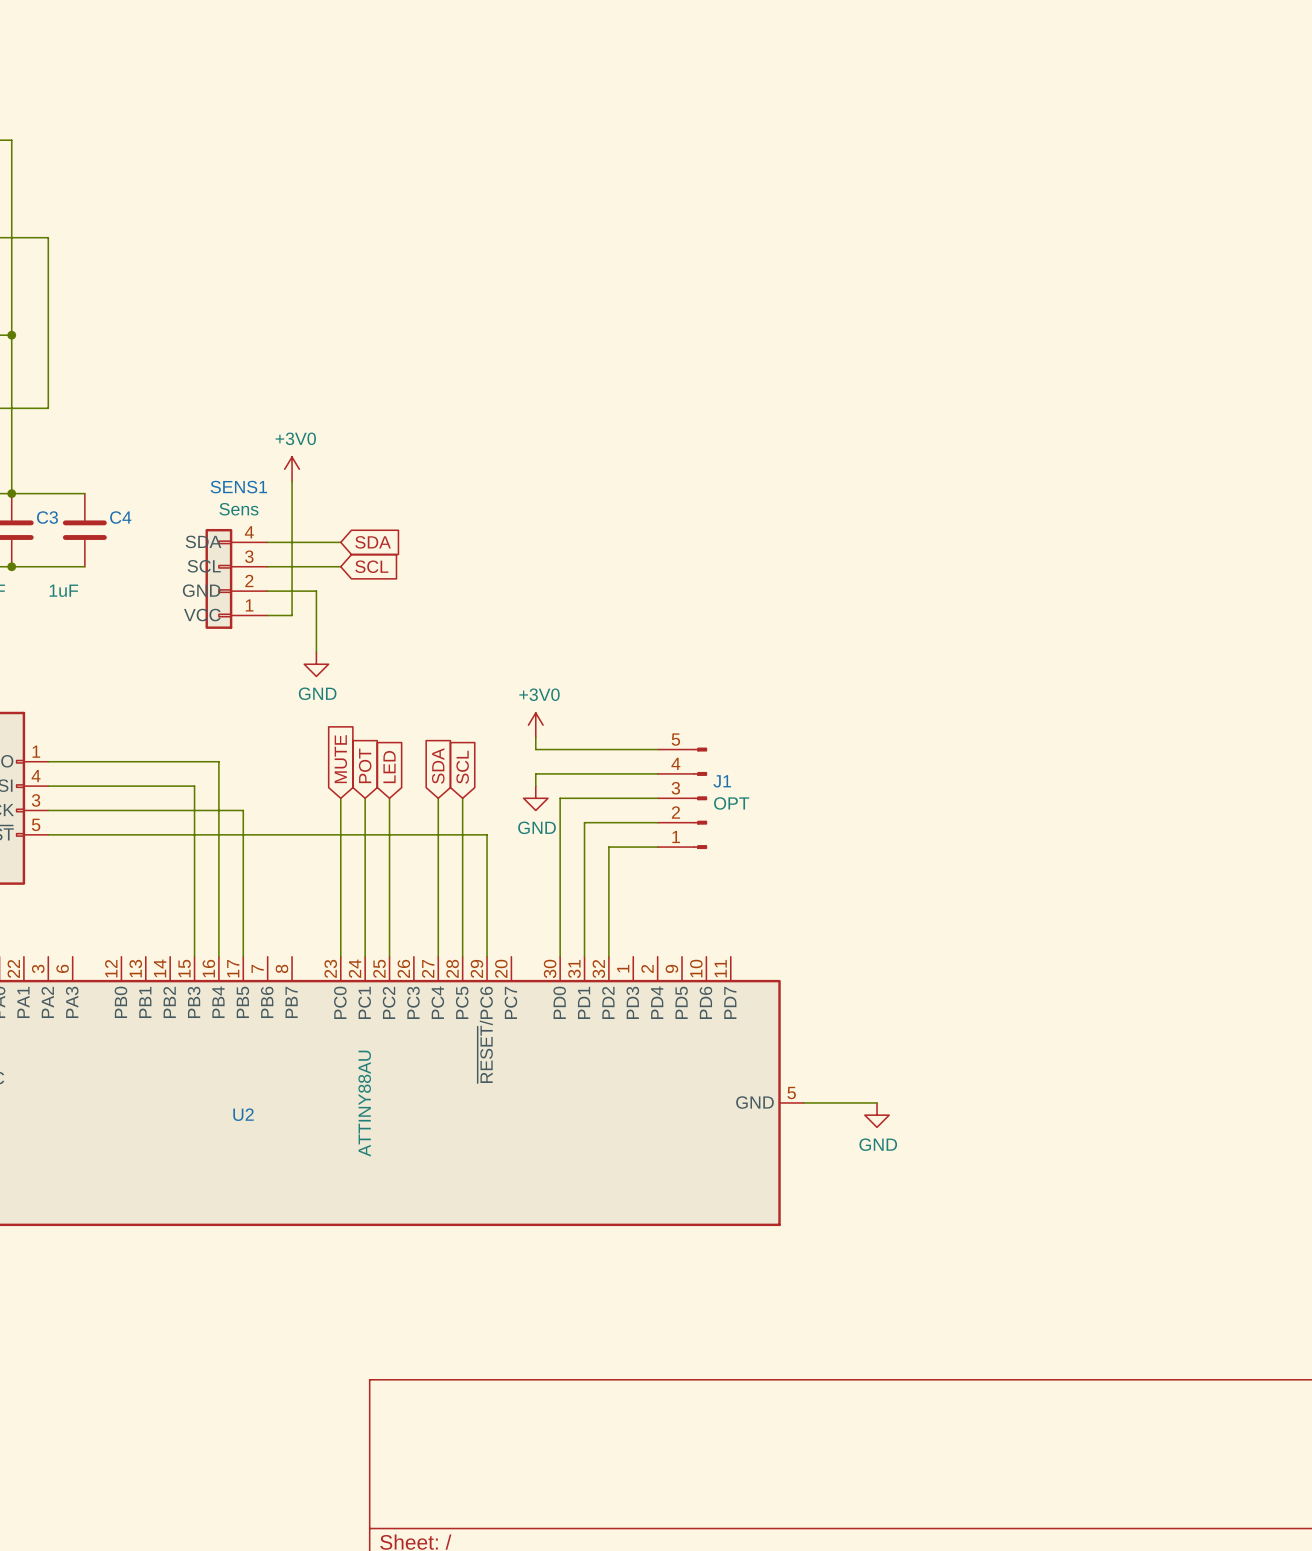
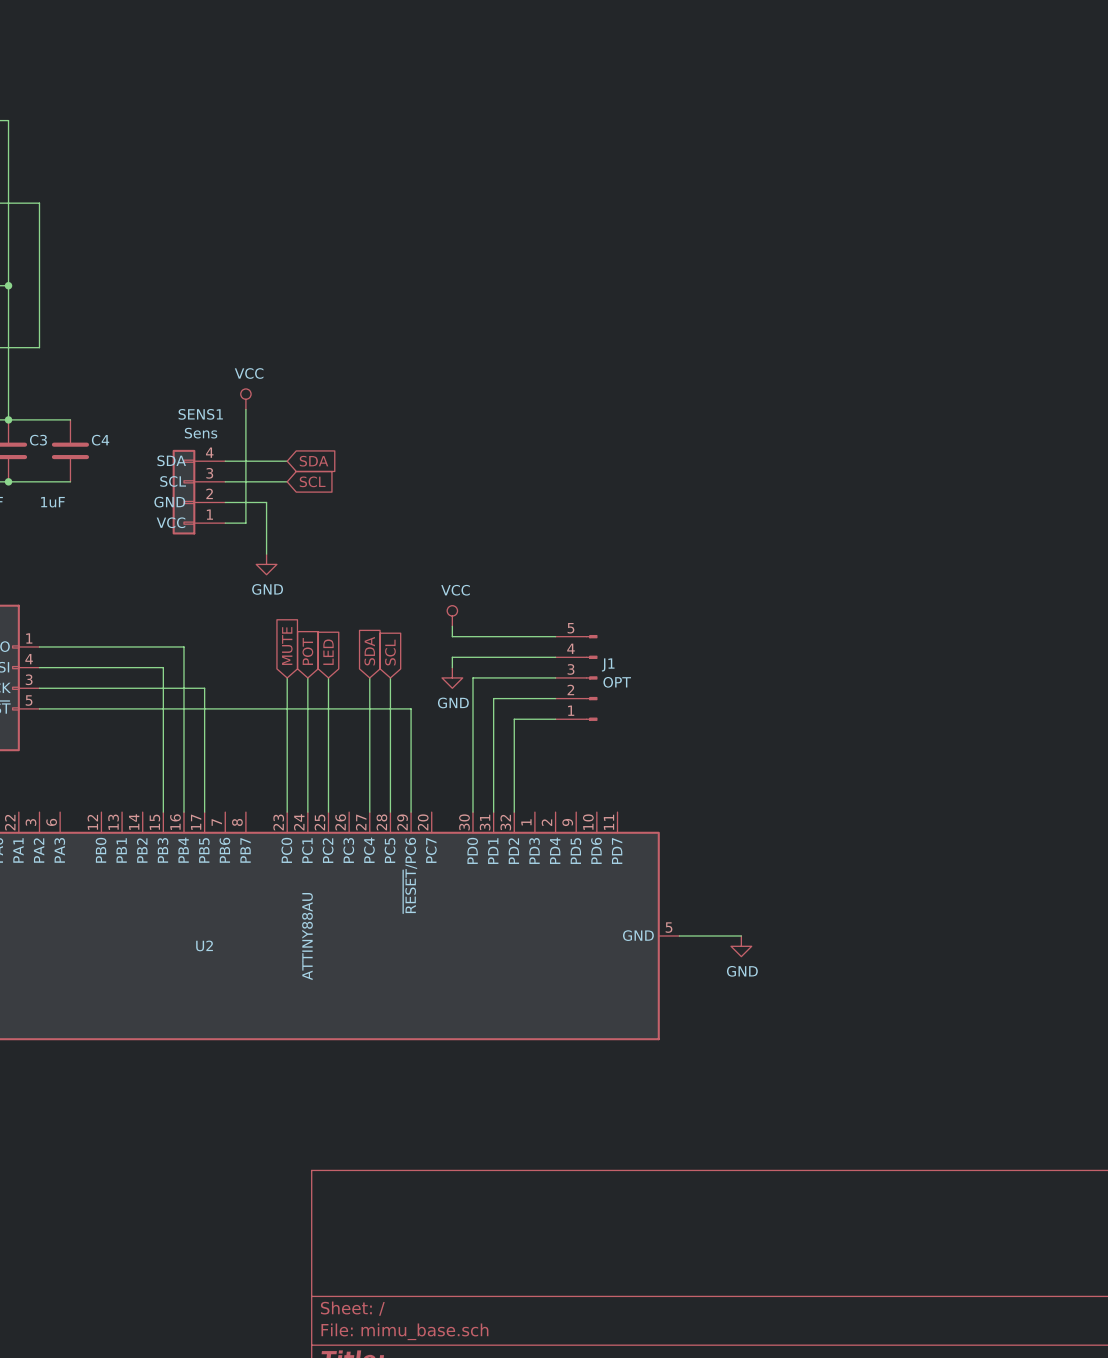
power symbol: +3V0 (292, 469) -> VCC (245, 399)
power symbol: +3V0 (535, 725) -> VCC (452, 616)

